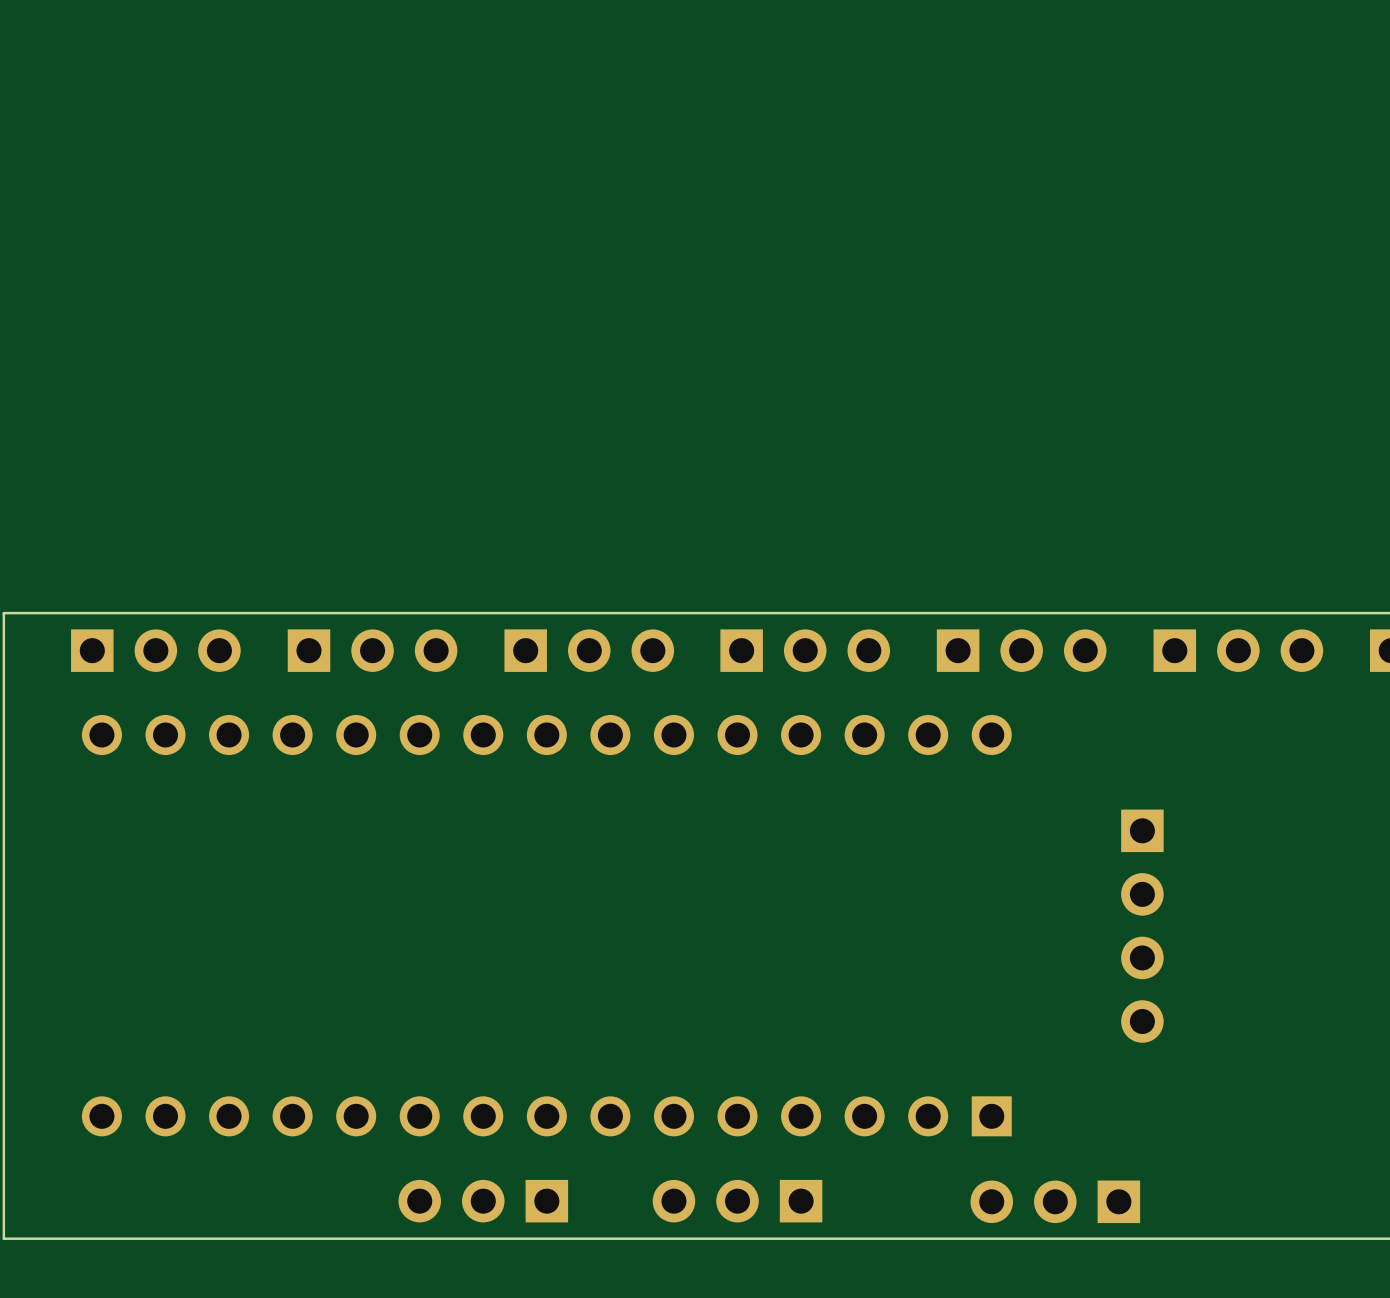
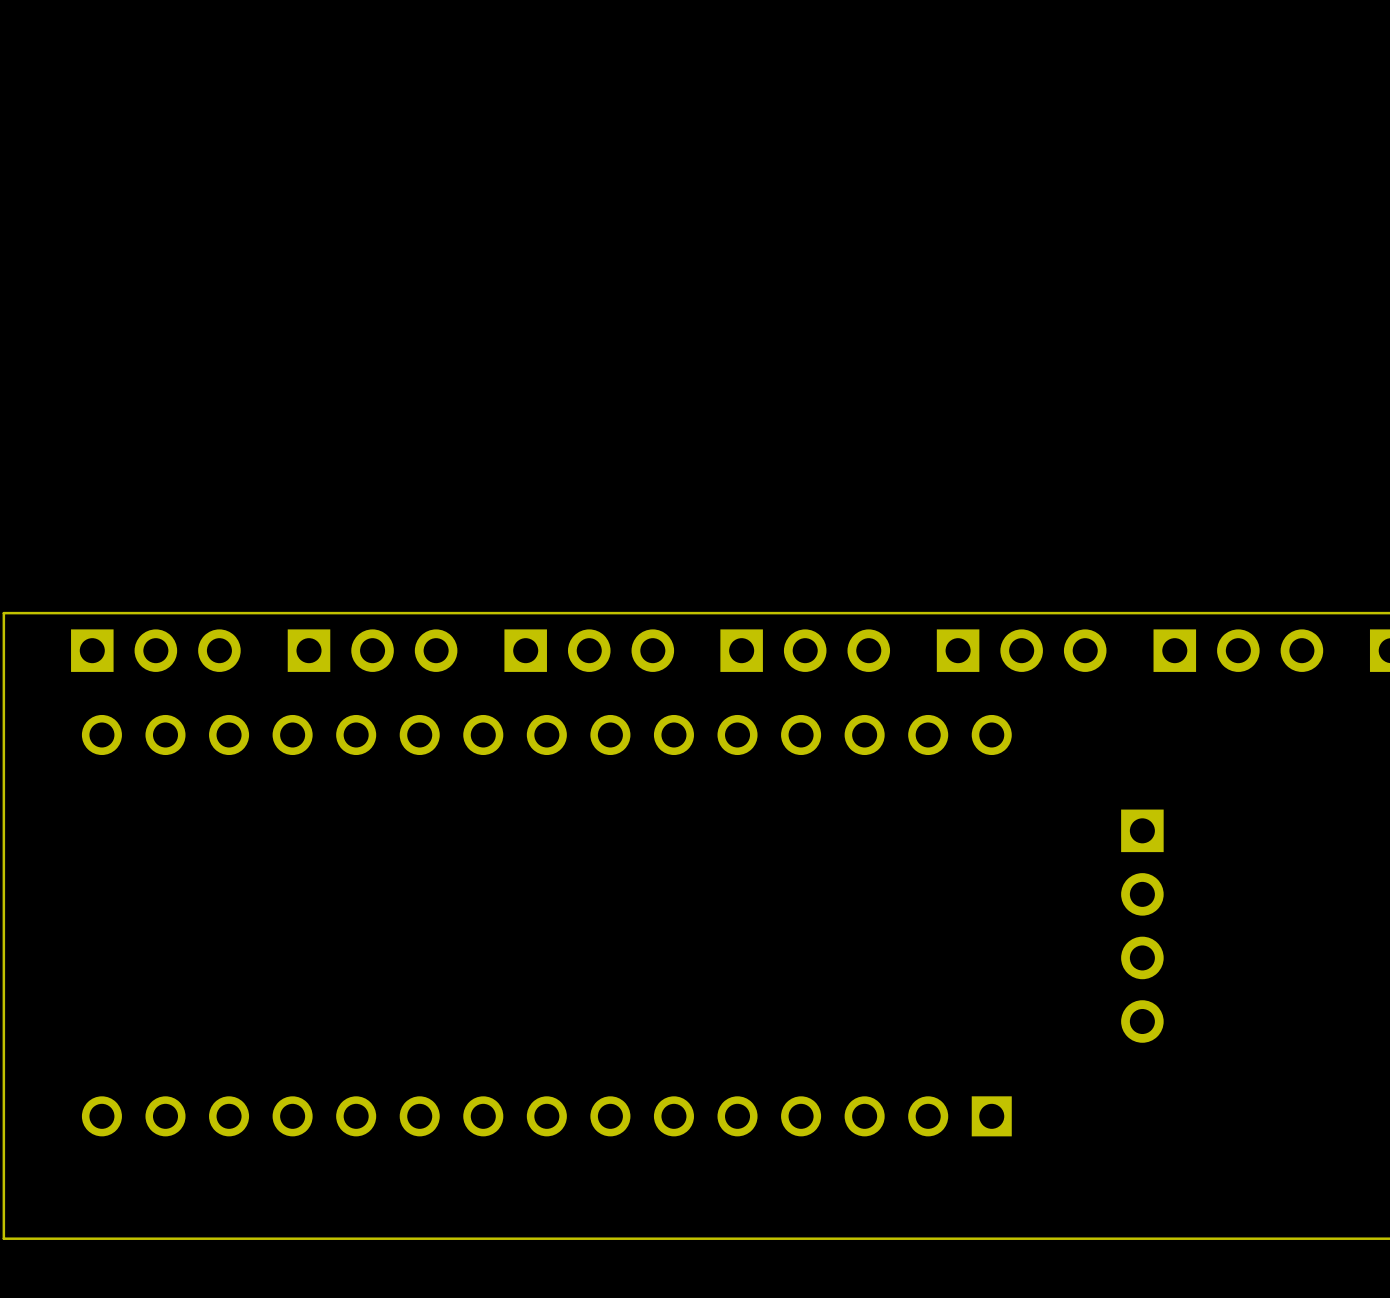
part: (483, 1201) -> none
part: (737, 1201) -> none
part: (1055, 1201) -> none

